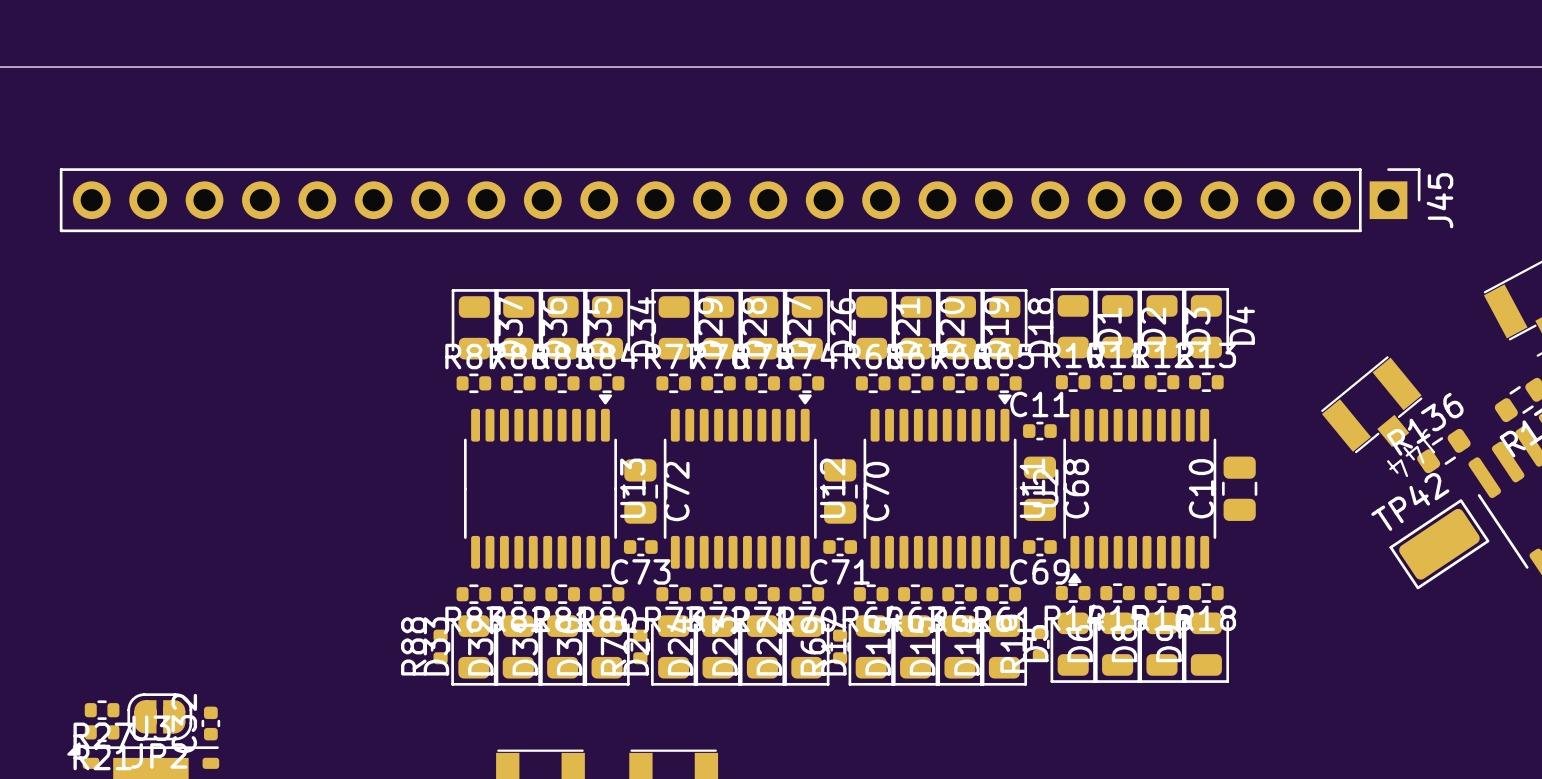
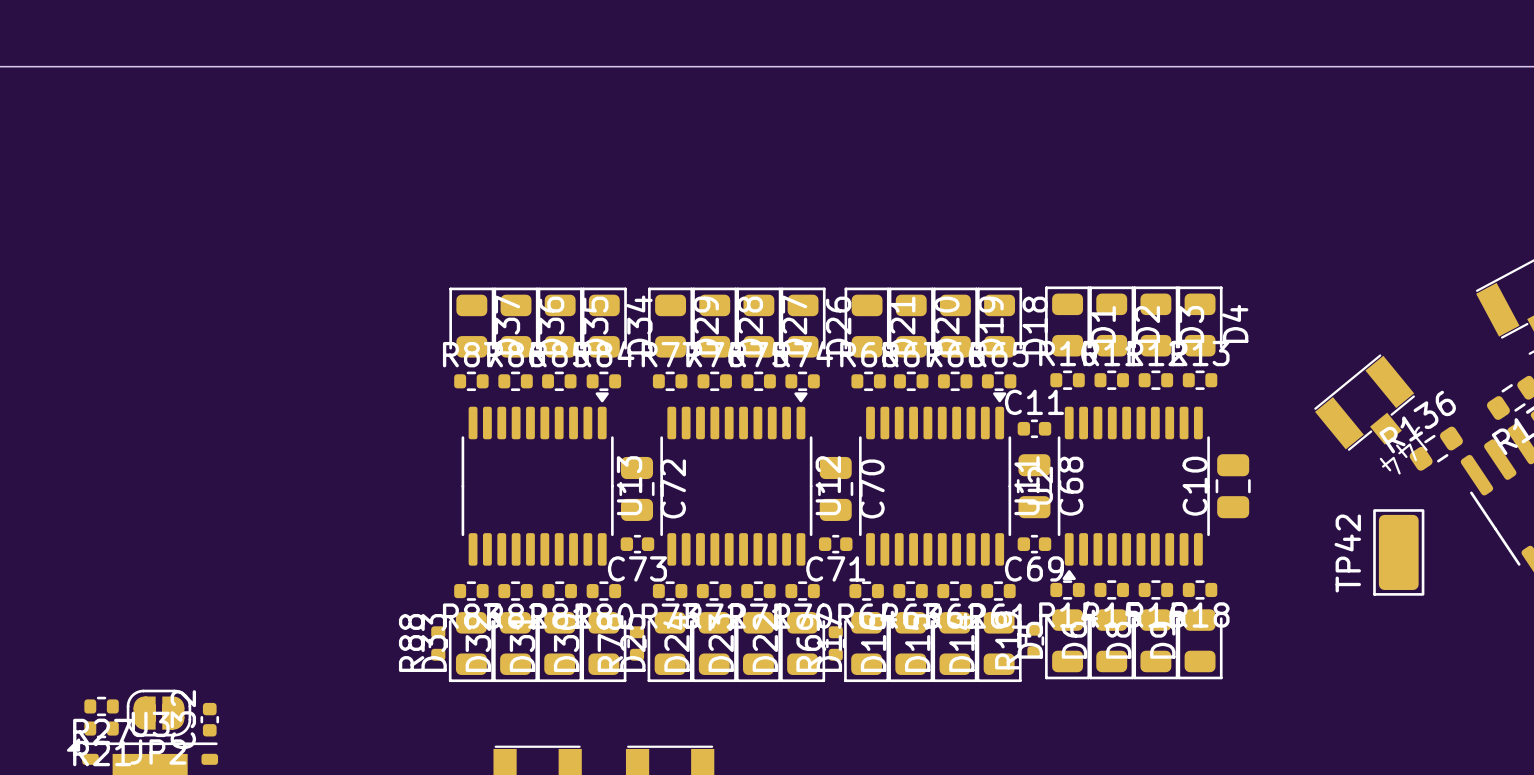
J45: (740, 200) -> none
TP42 rotation: 0° (1439, 544) -> 56.2° counterclockwise (1398, 552)

